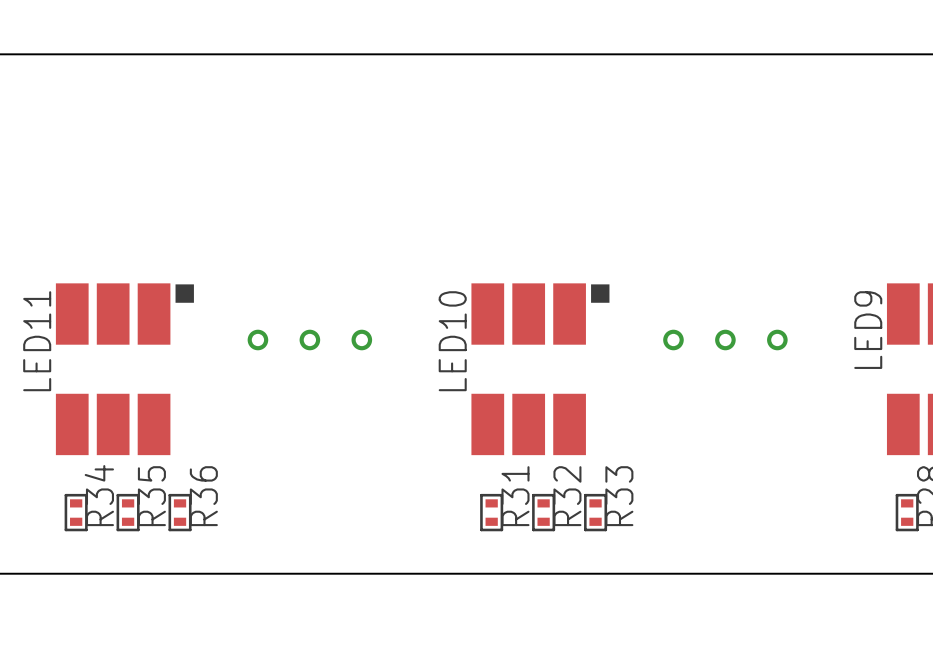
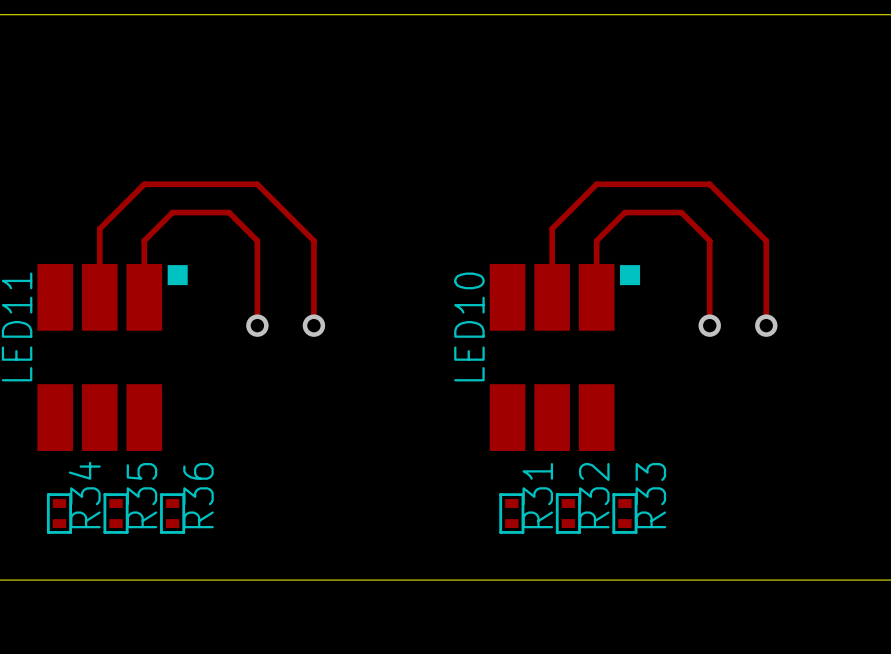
top track: none -> (99, 297) (99, 228) (144, 184) (257, 184) (313, 240) (313, 325)
top track: none -> (144, 297) (144, 240) (172, 212) (229, 212) (257, 240) (257, 325)
top track: none -> (552, 297) (552, 228) (596, 184) (709, 184) (766, 240) (766, 325)
top track: none -> (596, 297) (596, 240) (624, 212) (681, 212) (709, 240) (709, 325)
via: (361, 339) -> none
via: (777, 339) -> none

